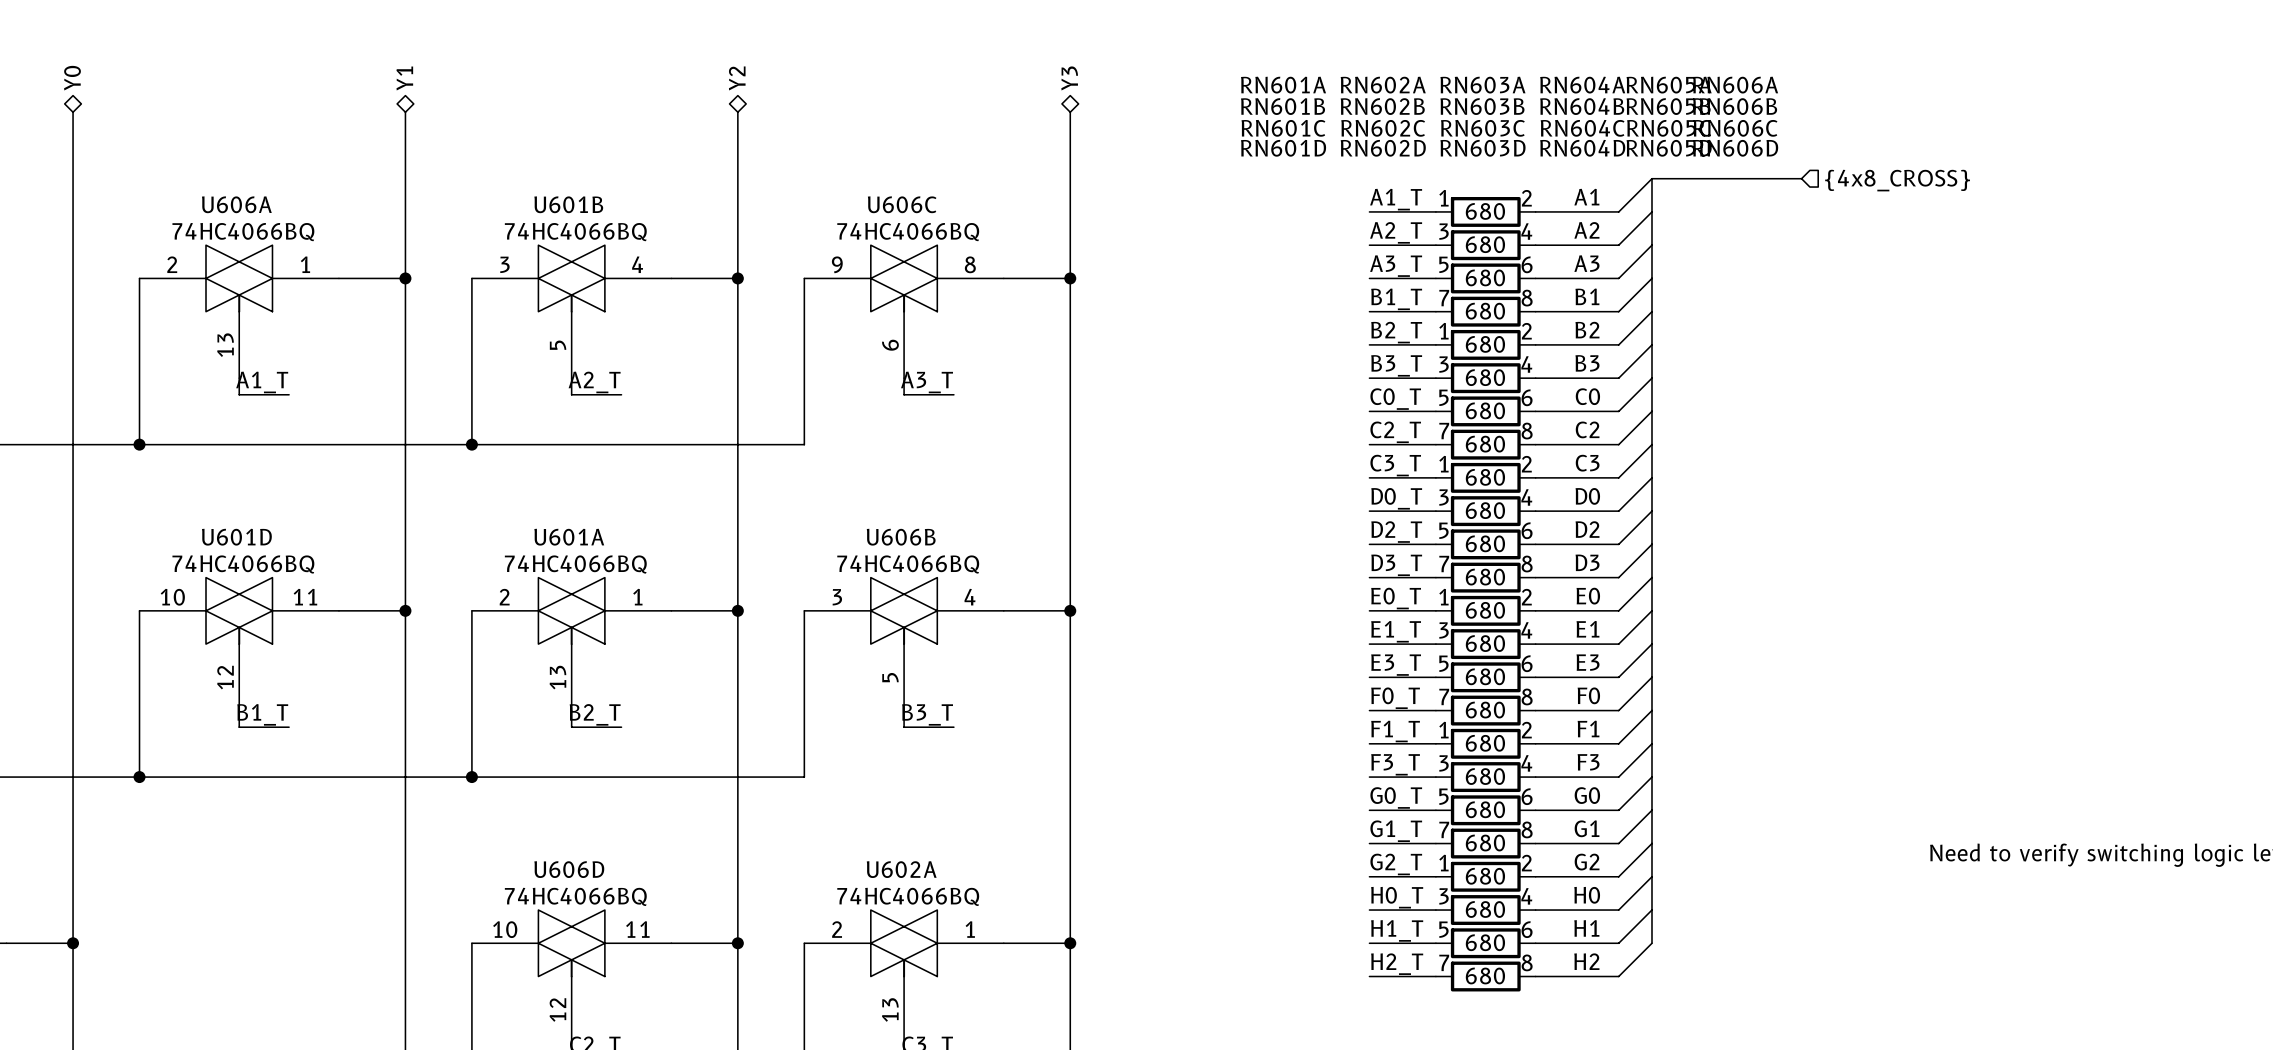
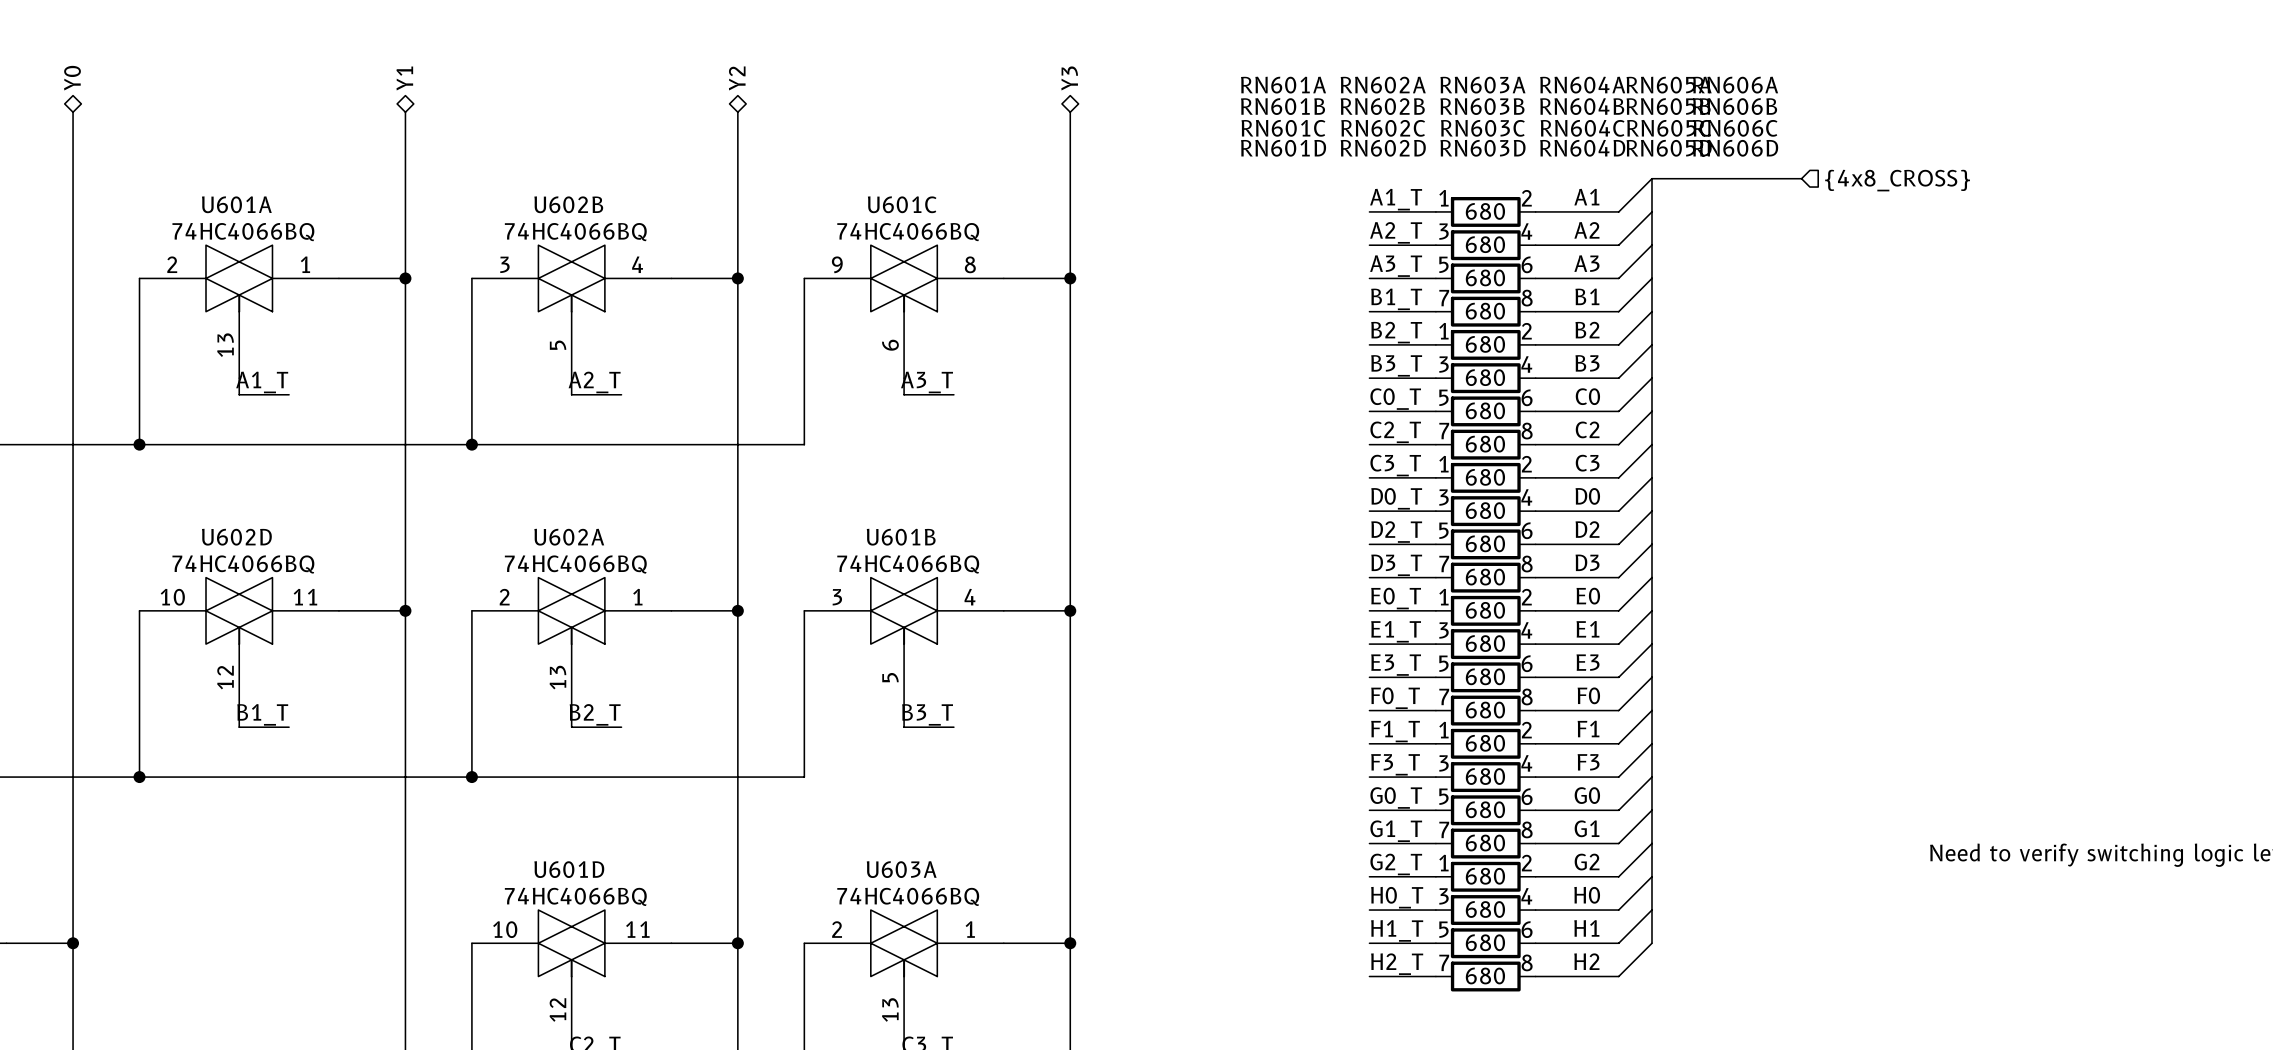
U606A name: U606A (236, 204) -> U601A (236, 204)
U601B name: U601B (568, 204) -> U602B (568, 204)
U606C name: U606C (902, 204) -> U601C (902, 204)
U601D name: U601D (236, 537) -> U602D (236, 537)
U601A name: U601A (569, 537) -> U602A (569, 537)
U606B name: U606B (901, 537) -> U601B (901, 537)
U606D name: U606D (569, 869) -> U601D (569, 869)
U602A name: U602A (901, 869) -> U603A (901, 869)

